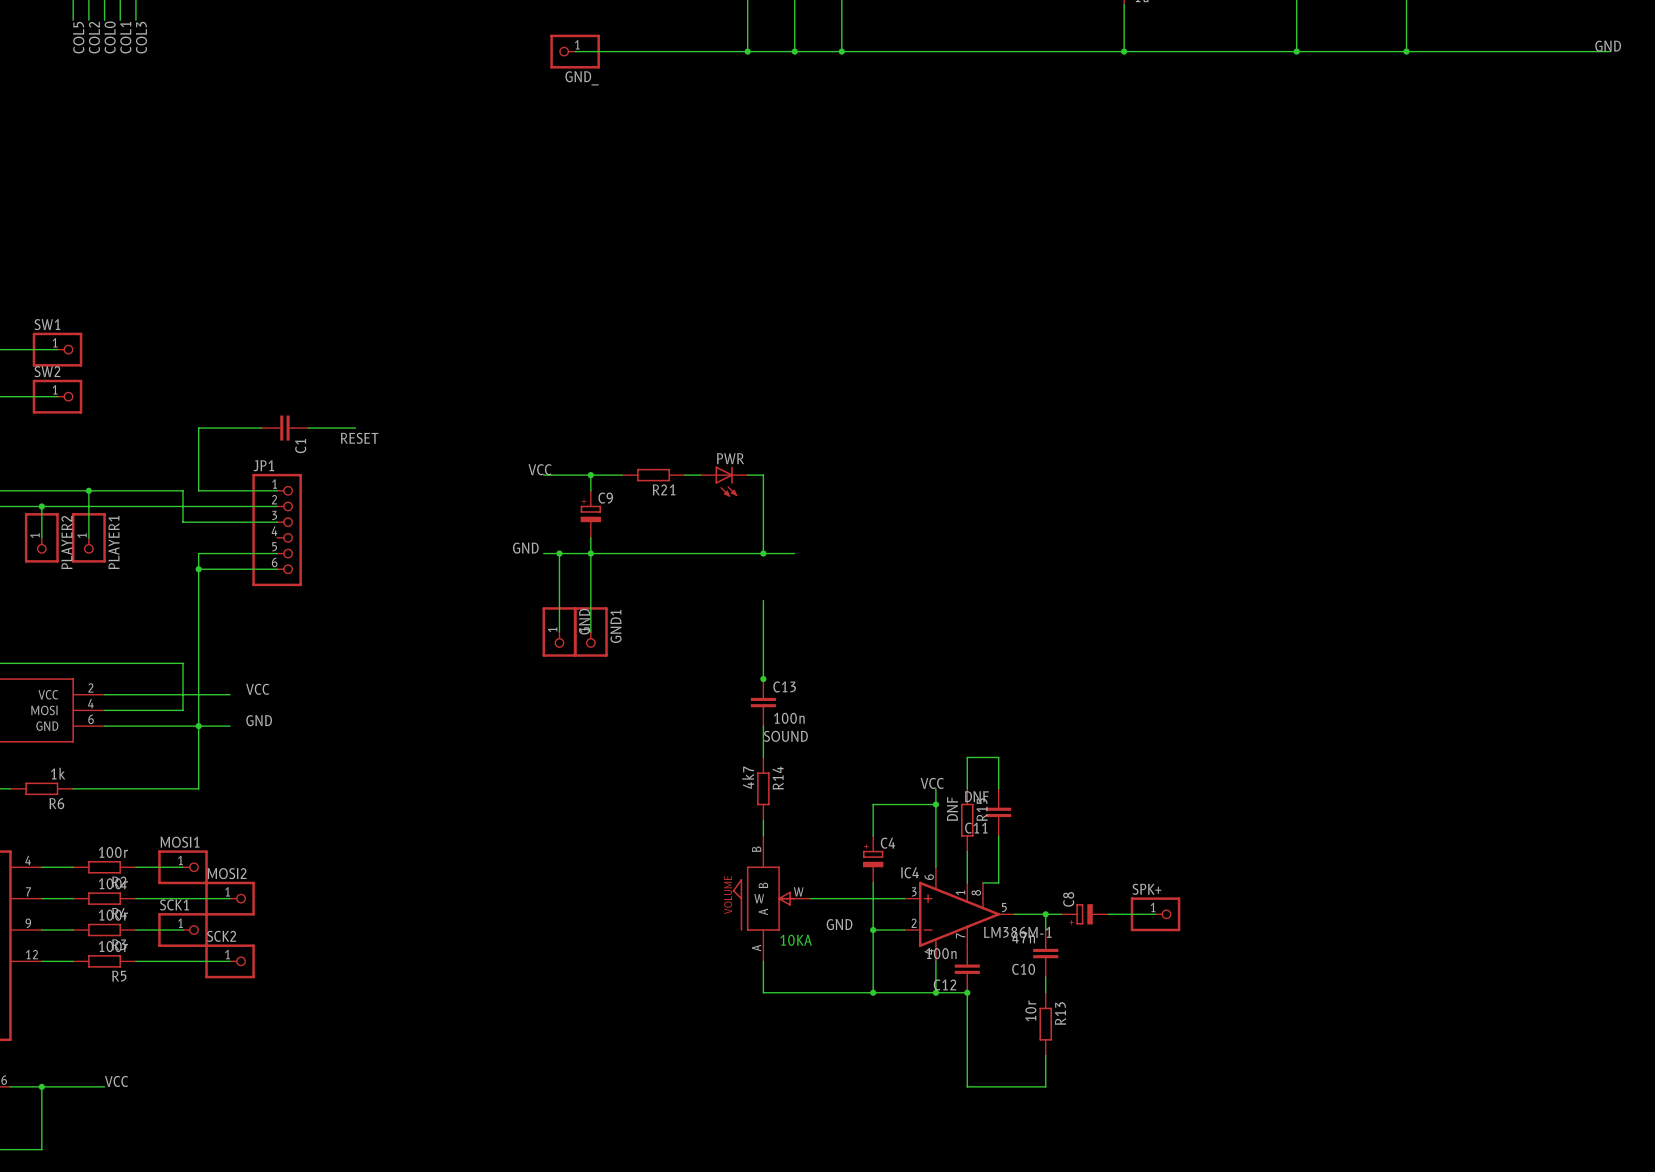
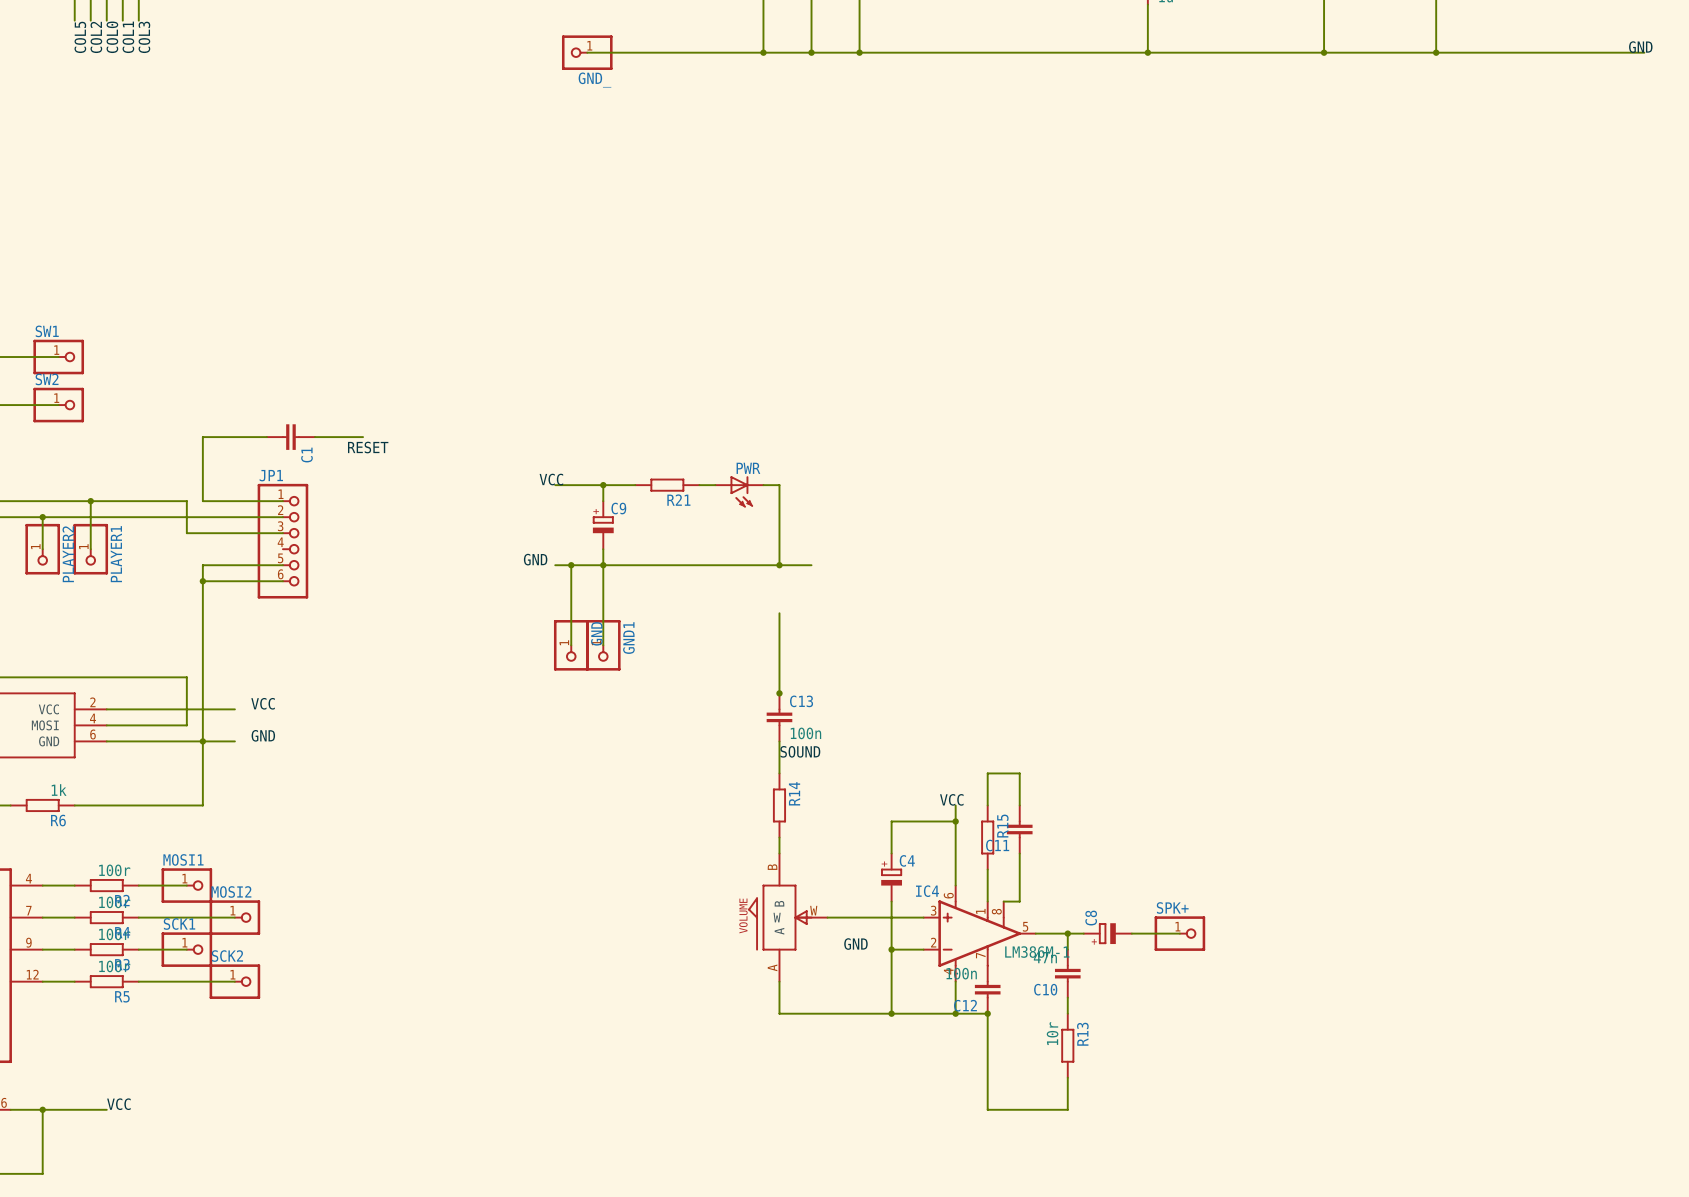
R14 value: 4k7 (748, 777) -> none
C11 value: DNF (976, 796) -> none
R15 value: DNF (952, 808) -> none
text: 10KA (796, 940) -> none

